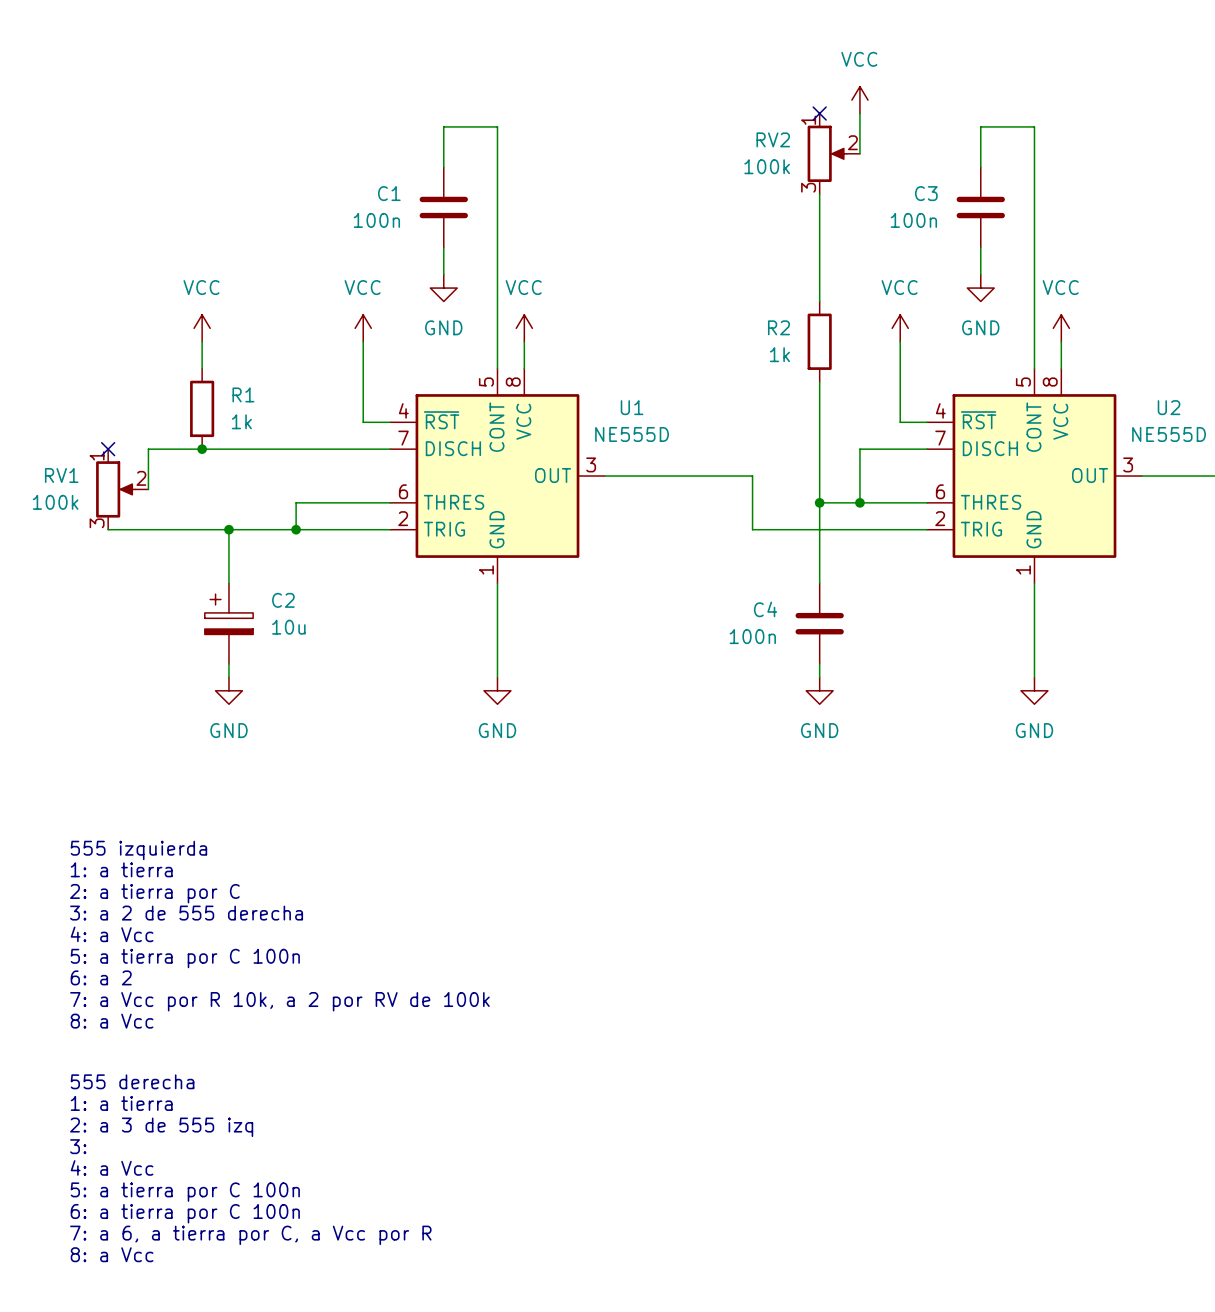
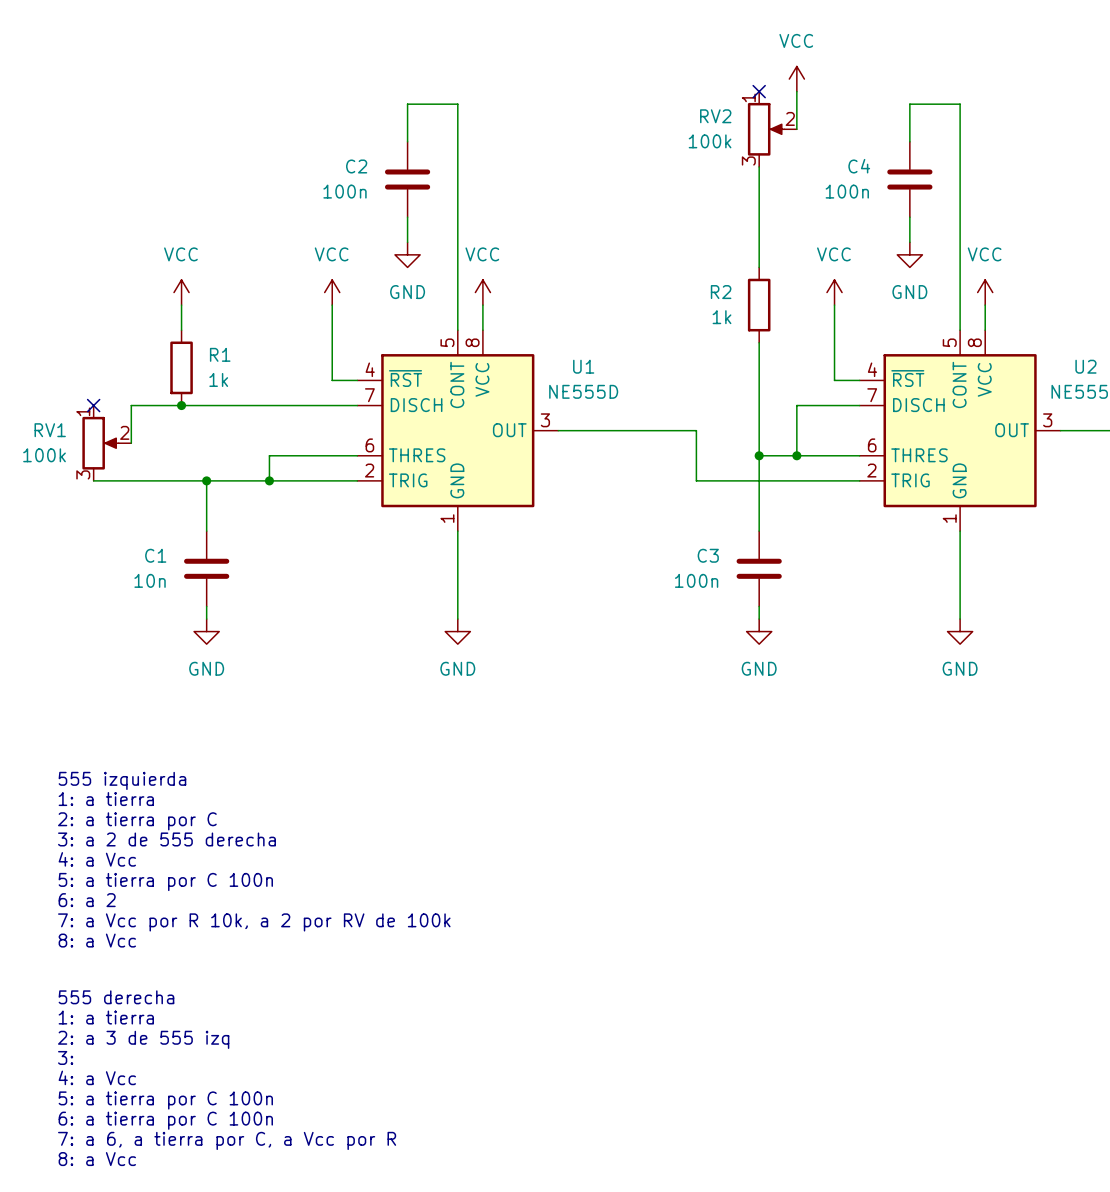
C1 name: C1 (389, 193) -> C2 (356, 166)
C3 name: C3 (926, 193) -> C4 (859, 166)
C4 name: C4 (765, 609) -> C3 (708, 555)
C2: 10u (228, 623) -> none
C1: none -> 10n (206, 568)

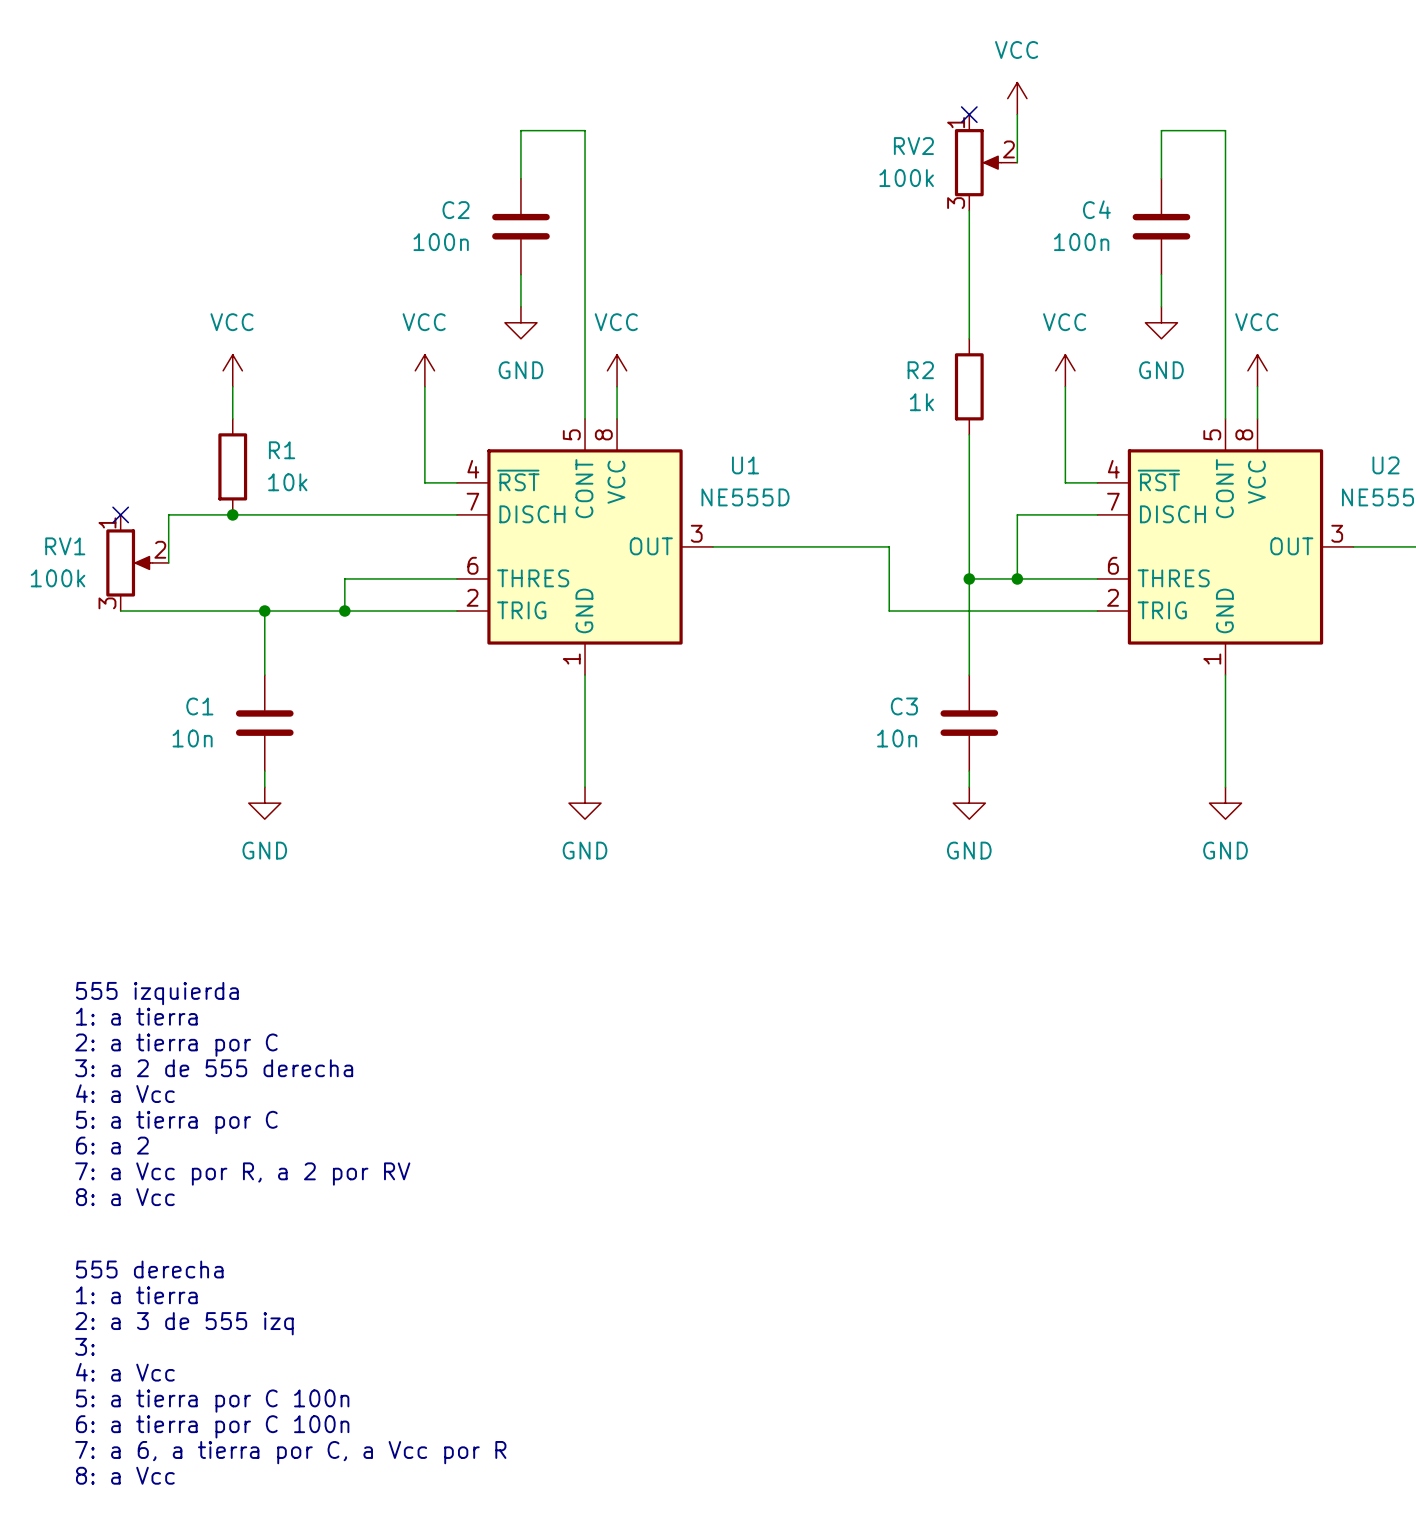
R1 value: 1k (218, 379) -> 10k (287, 482)
C3 value: 100n (696, 580) -> 10n (897, 738)
text: 5: a tierra por C 100n (165, 882) -> 5: a tierra por C (176, 1122)
text: 7: a Vcc por R 10k, a 2 por RV de 100k (254, 922) -> 7: a Vcc por R, a 2 por RV (242, 1174)

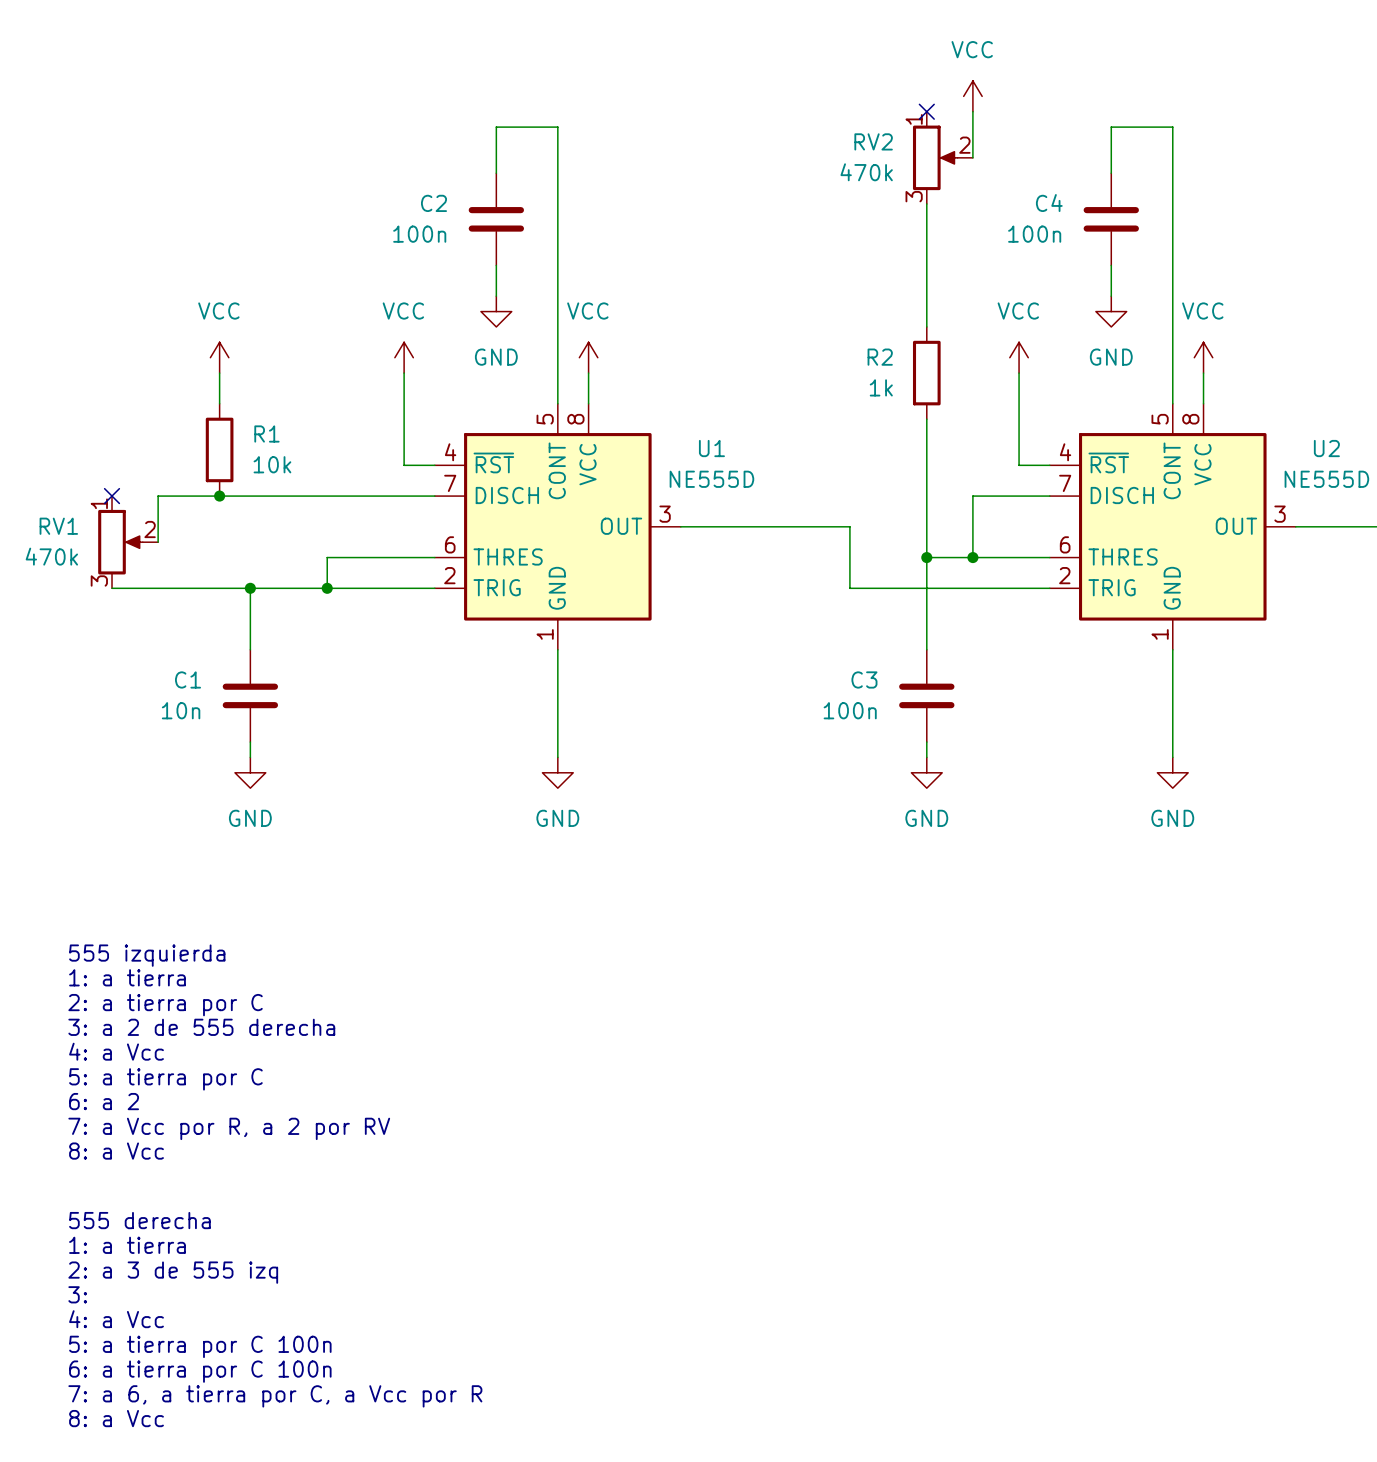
RV2 value: 100k (906, 178) -> 470k (866, 172)
RV1 value: 100k (58, 578) -> 470k (51, 556)
C3 value: 10n (897, 738) -> 100n (850, 710)

